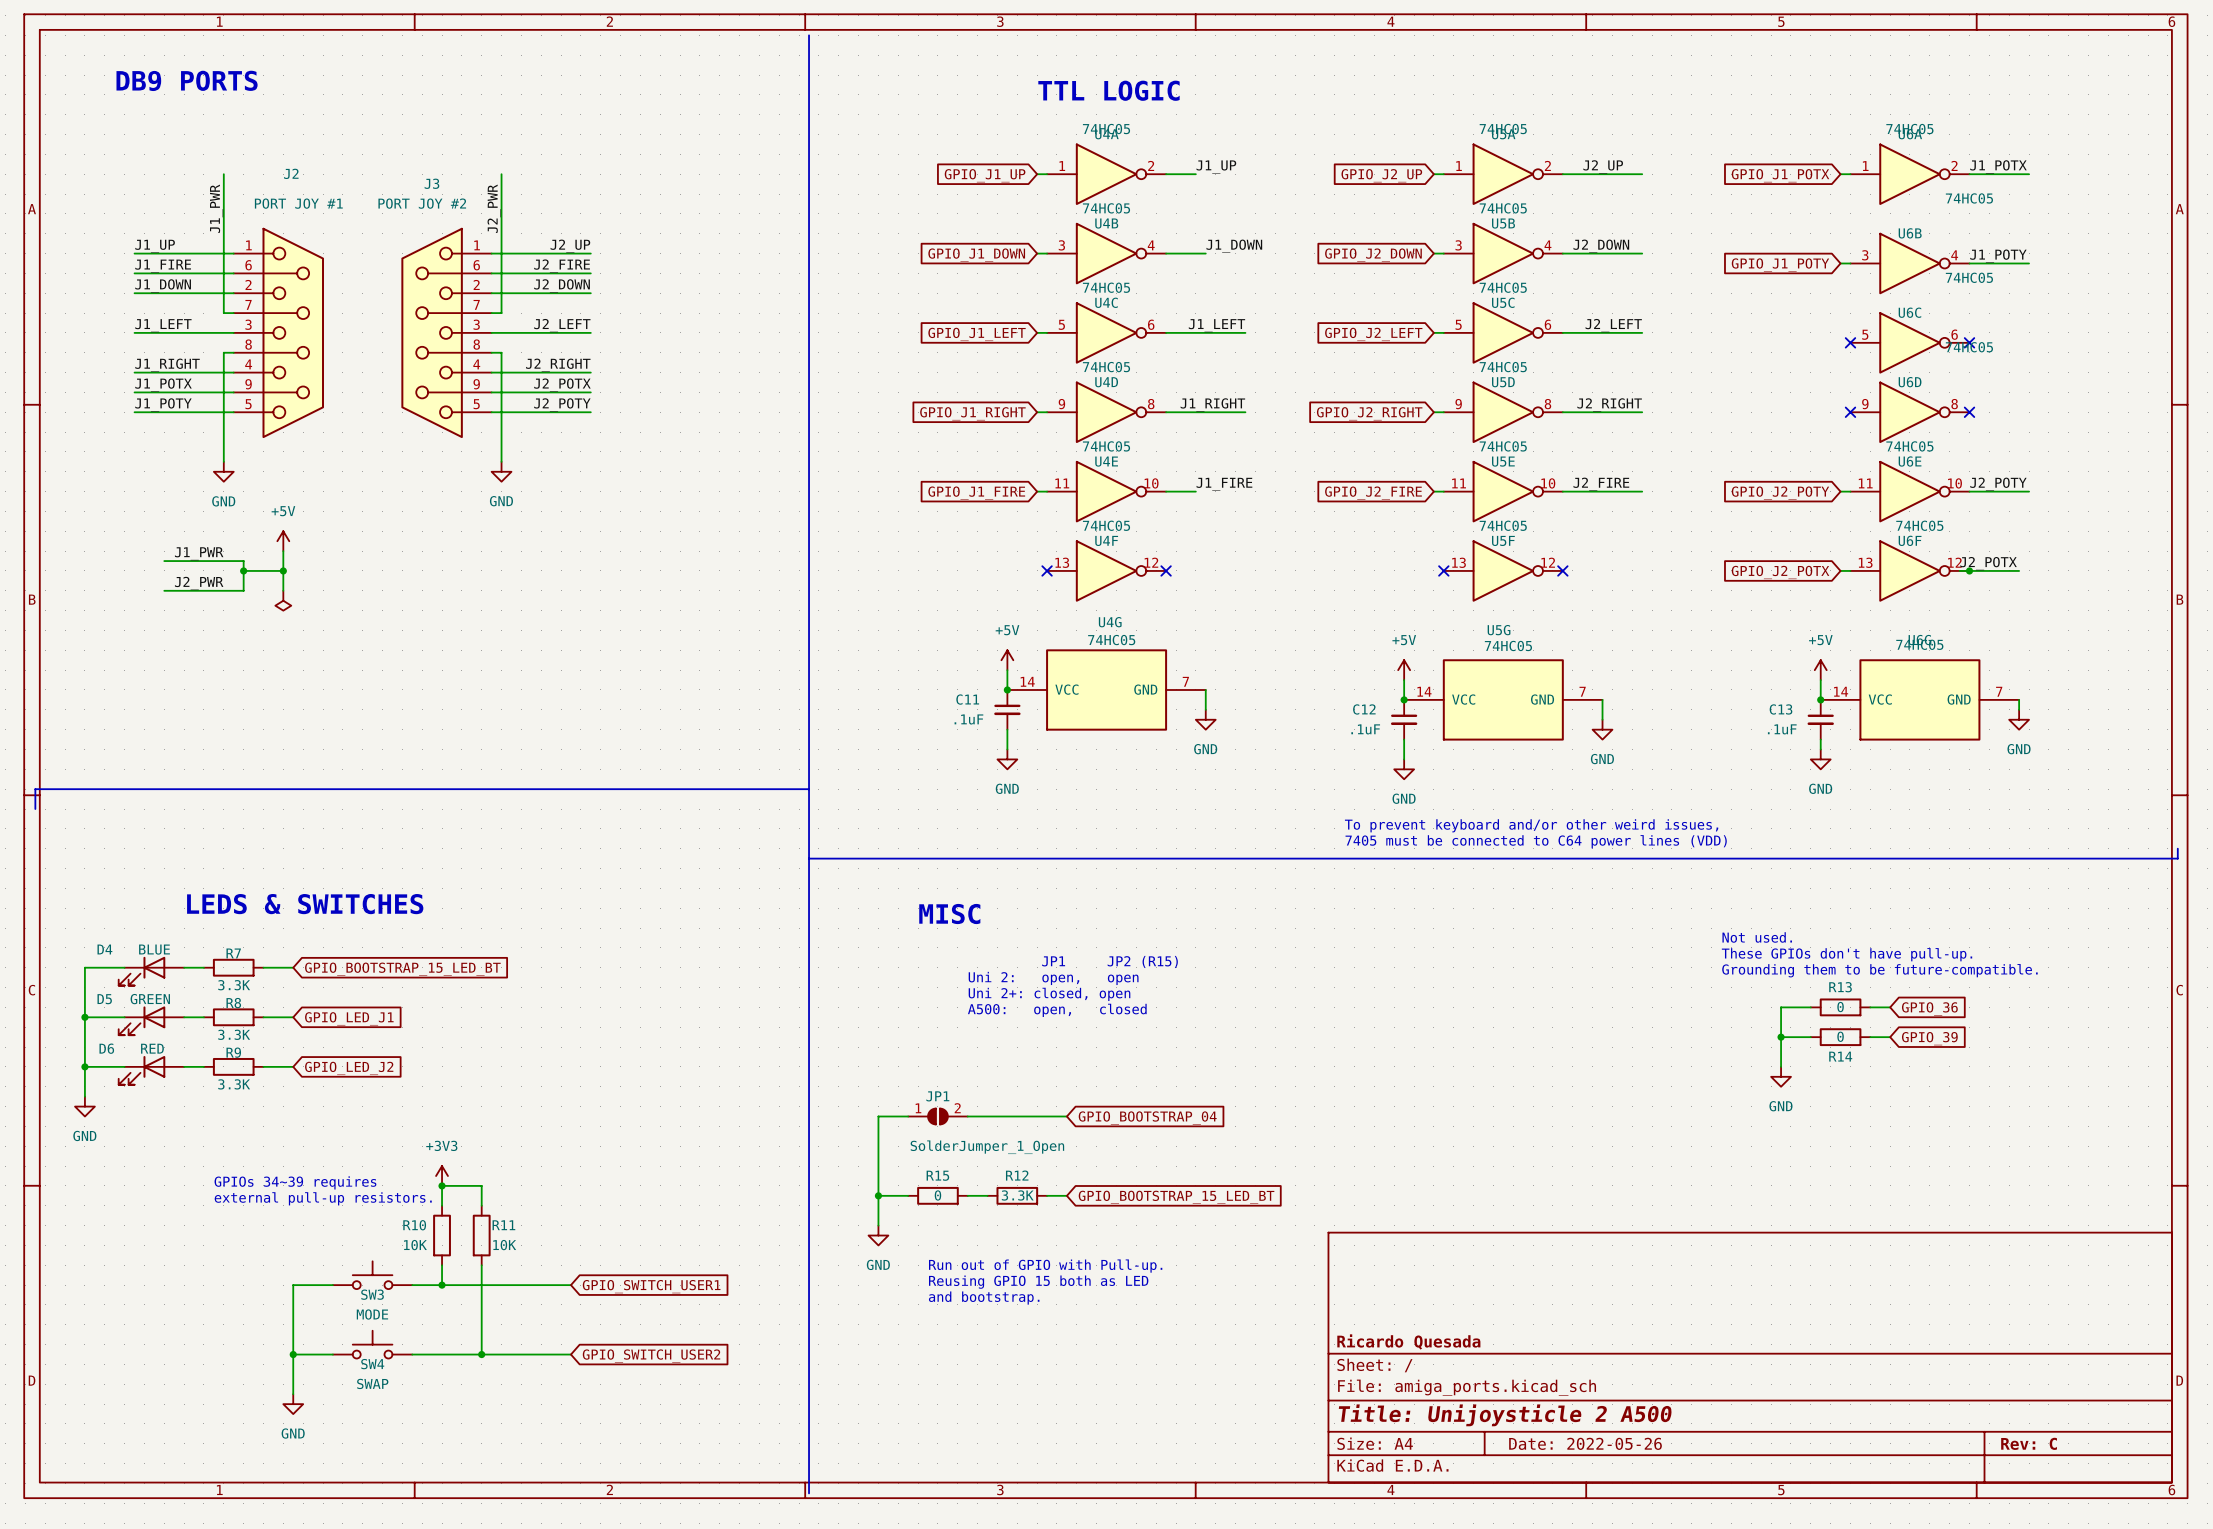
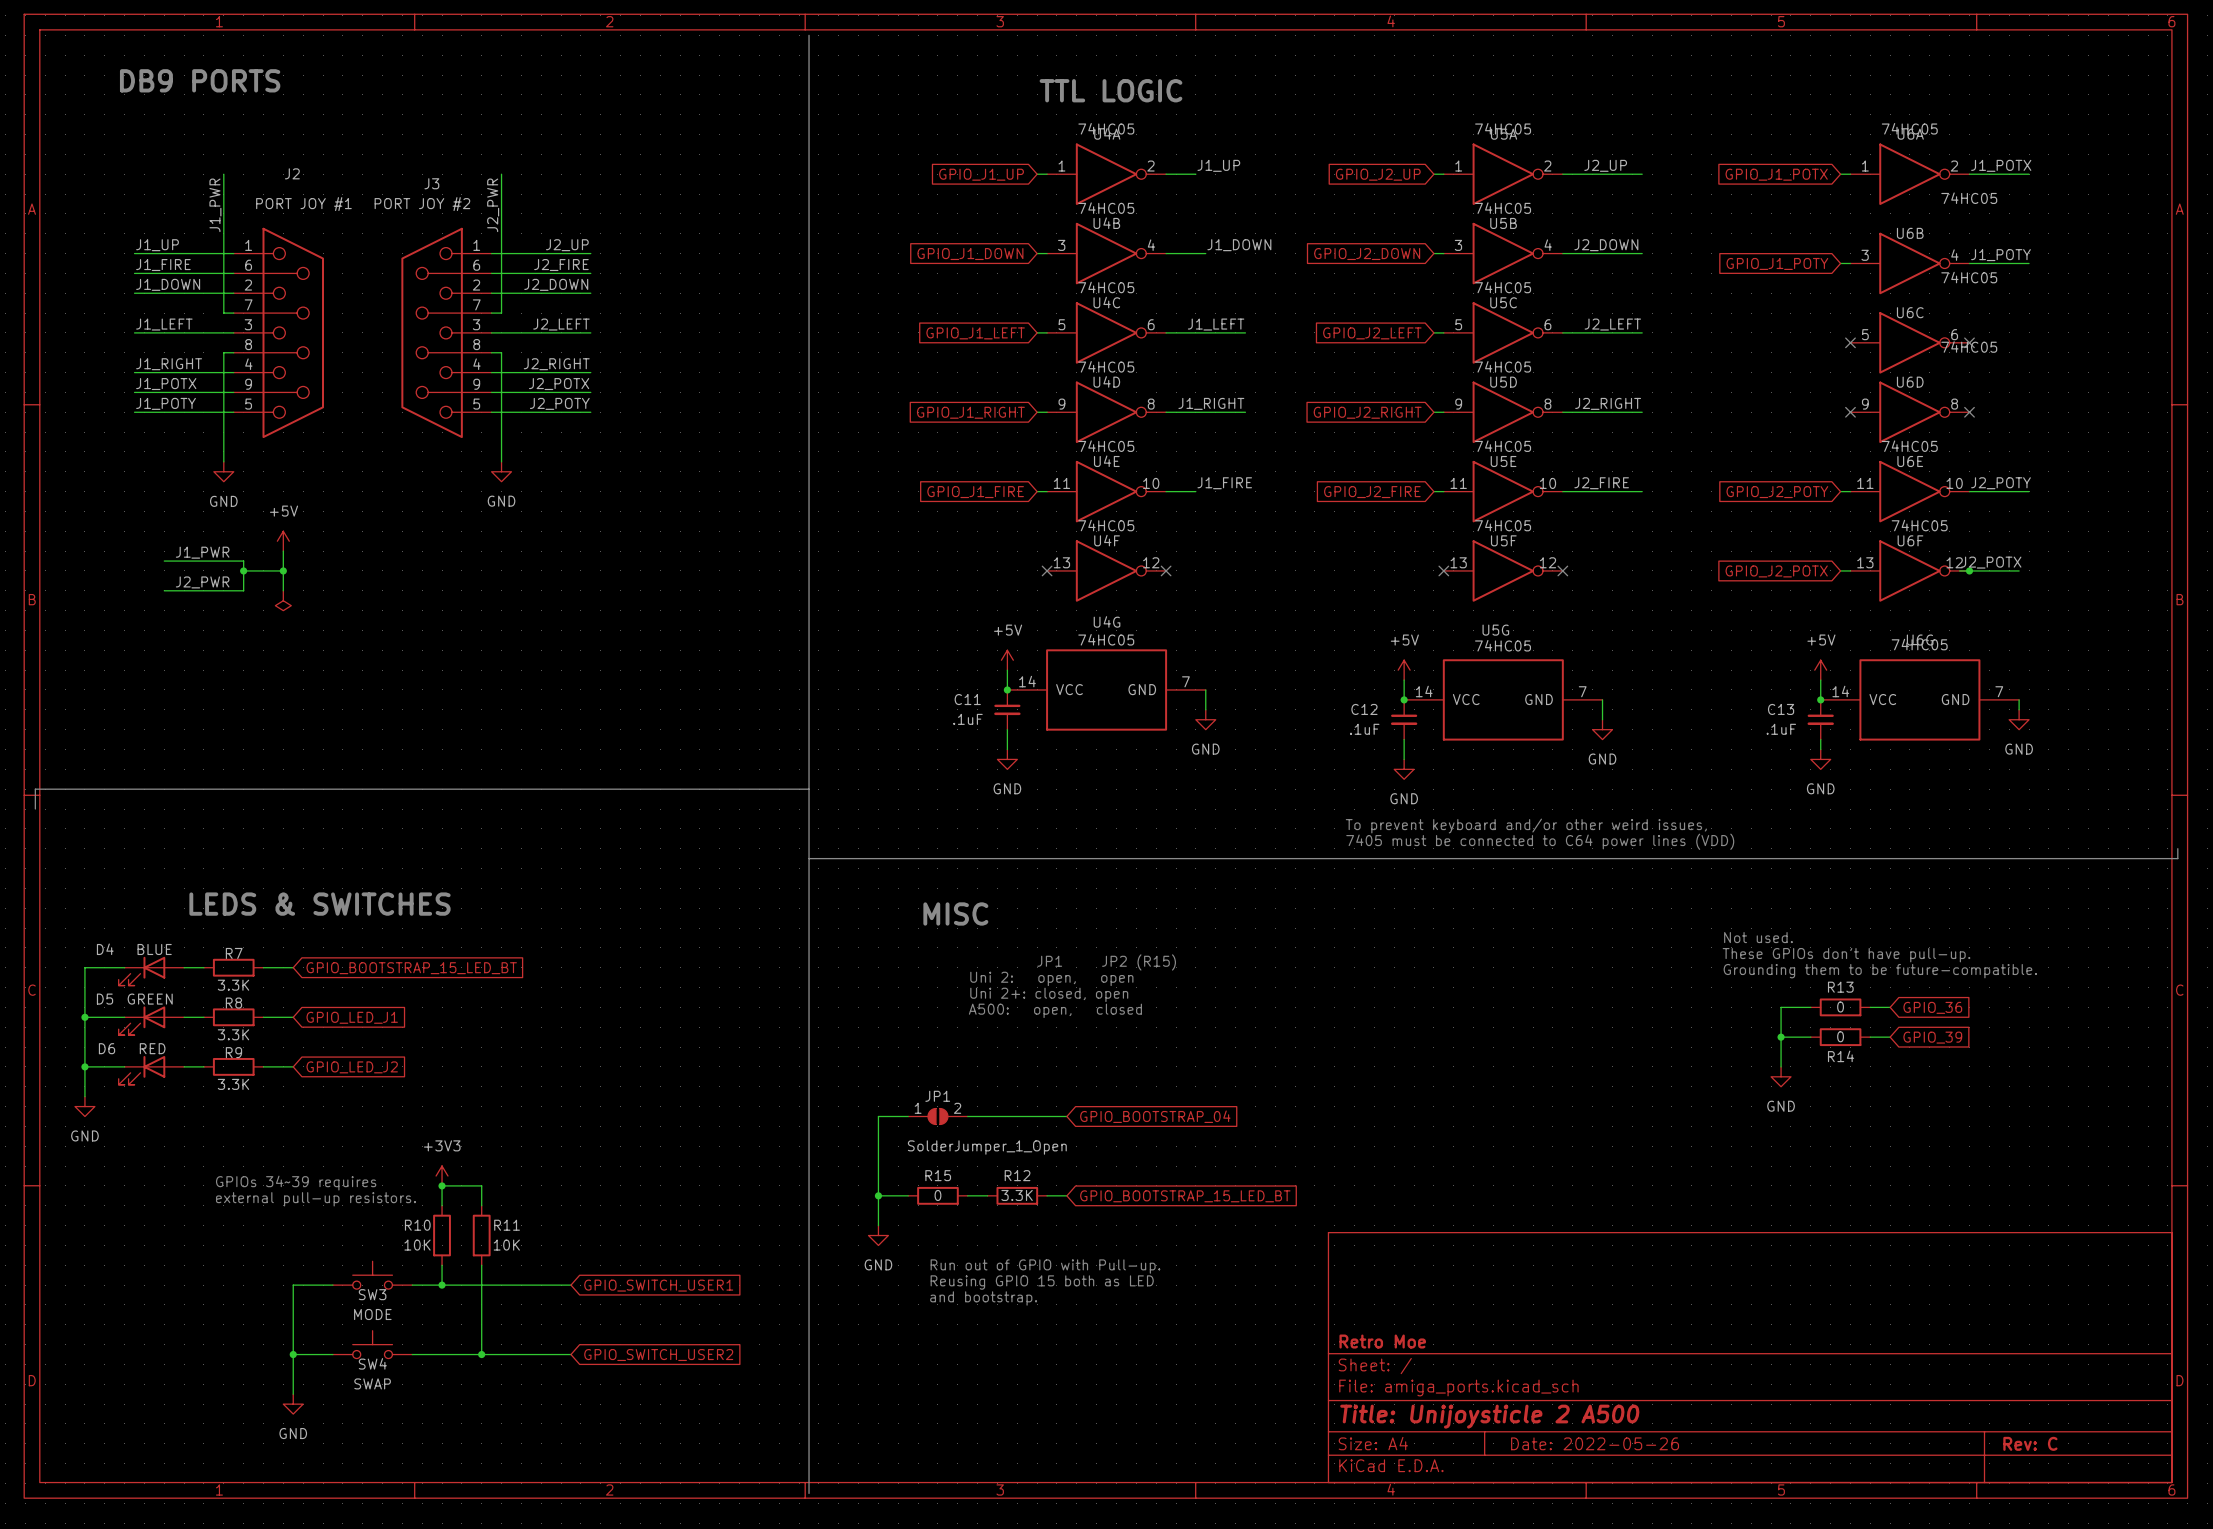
title block: Ricardo Quesada (1408, 1341) -> Retro Moe (1382, 1341)

